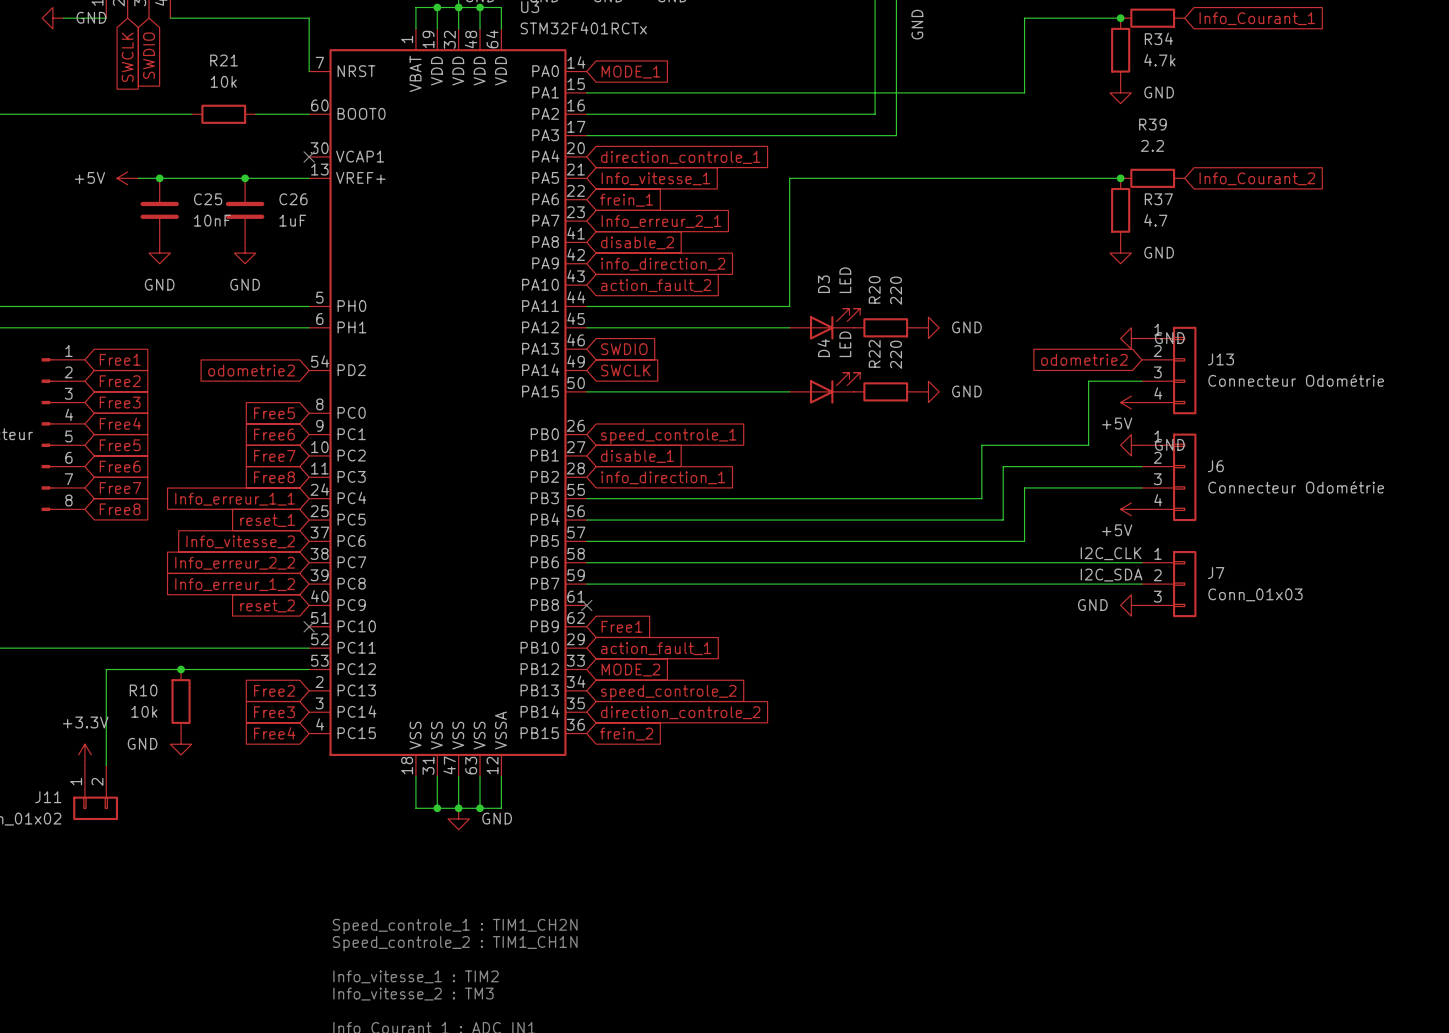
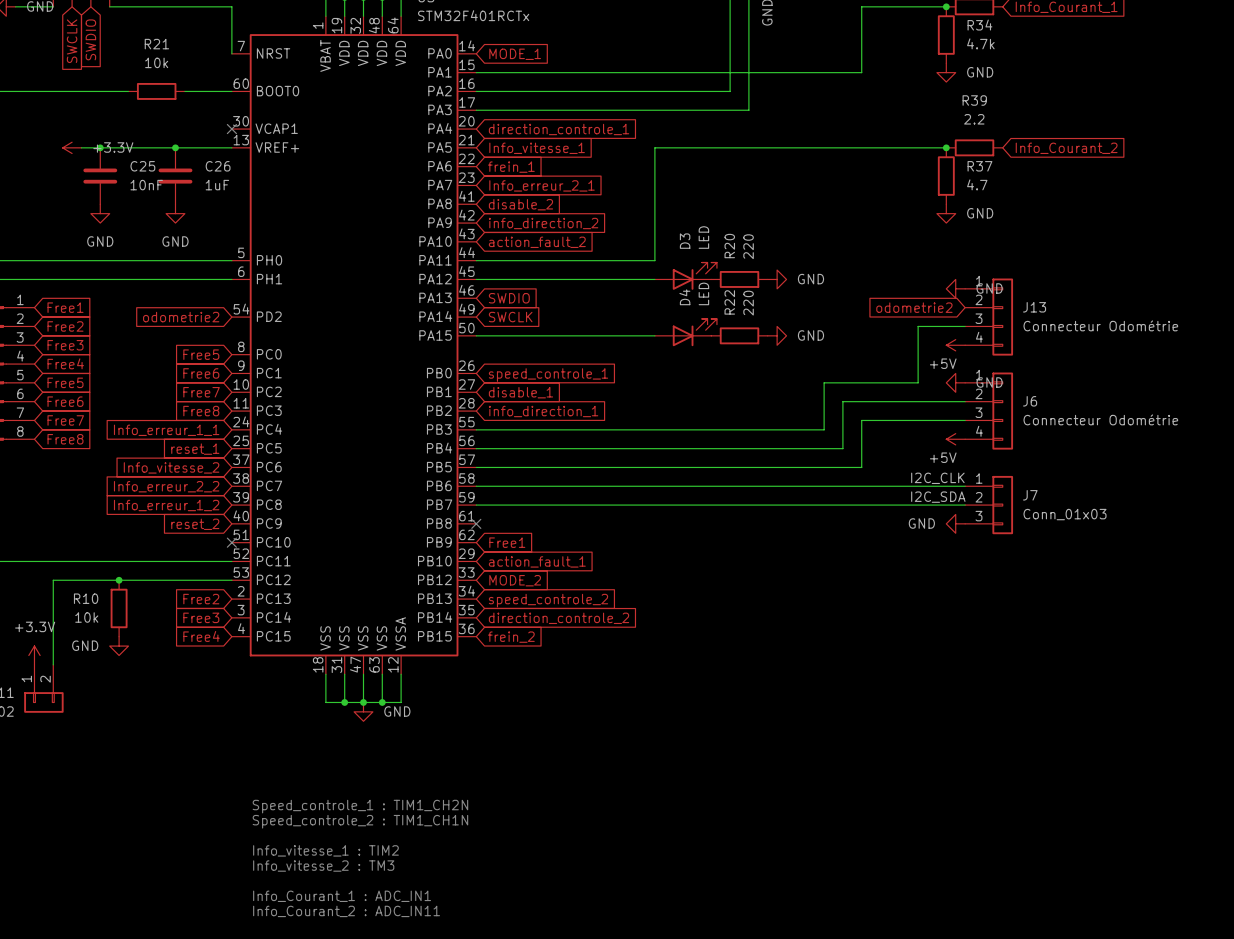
power symbol: +5V (127, 178) -> +3.3V (72, 147)

